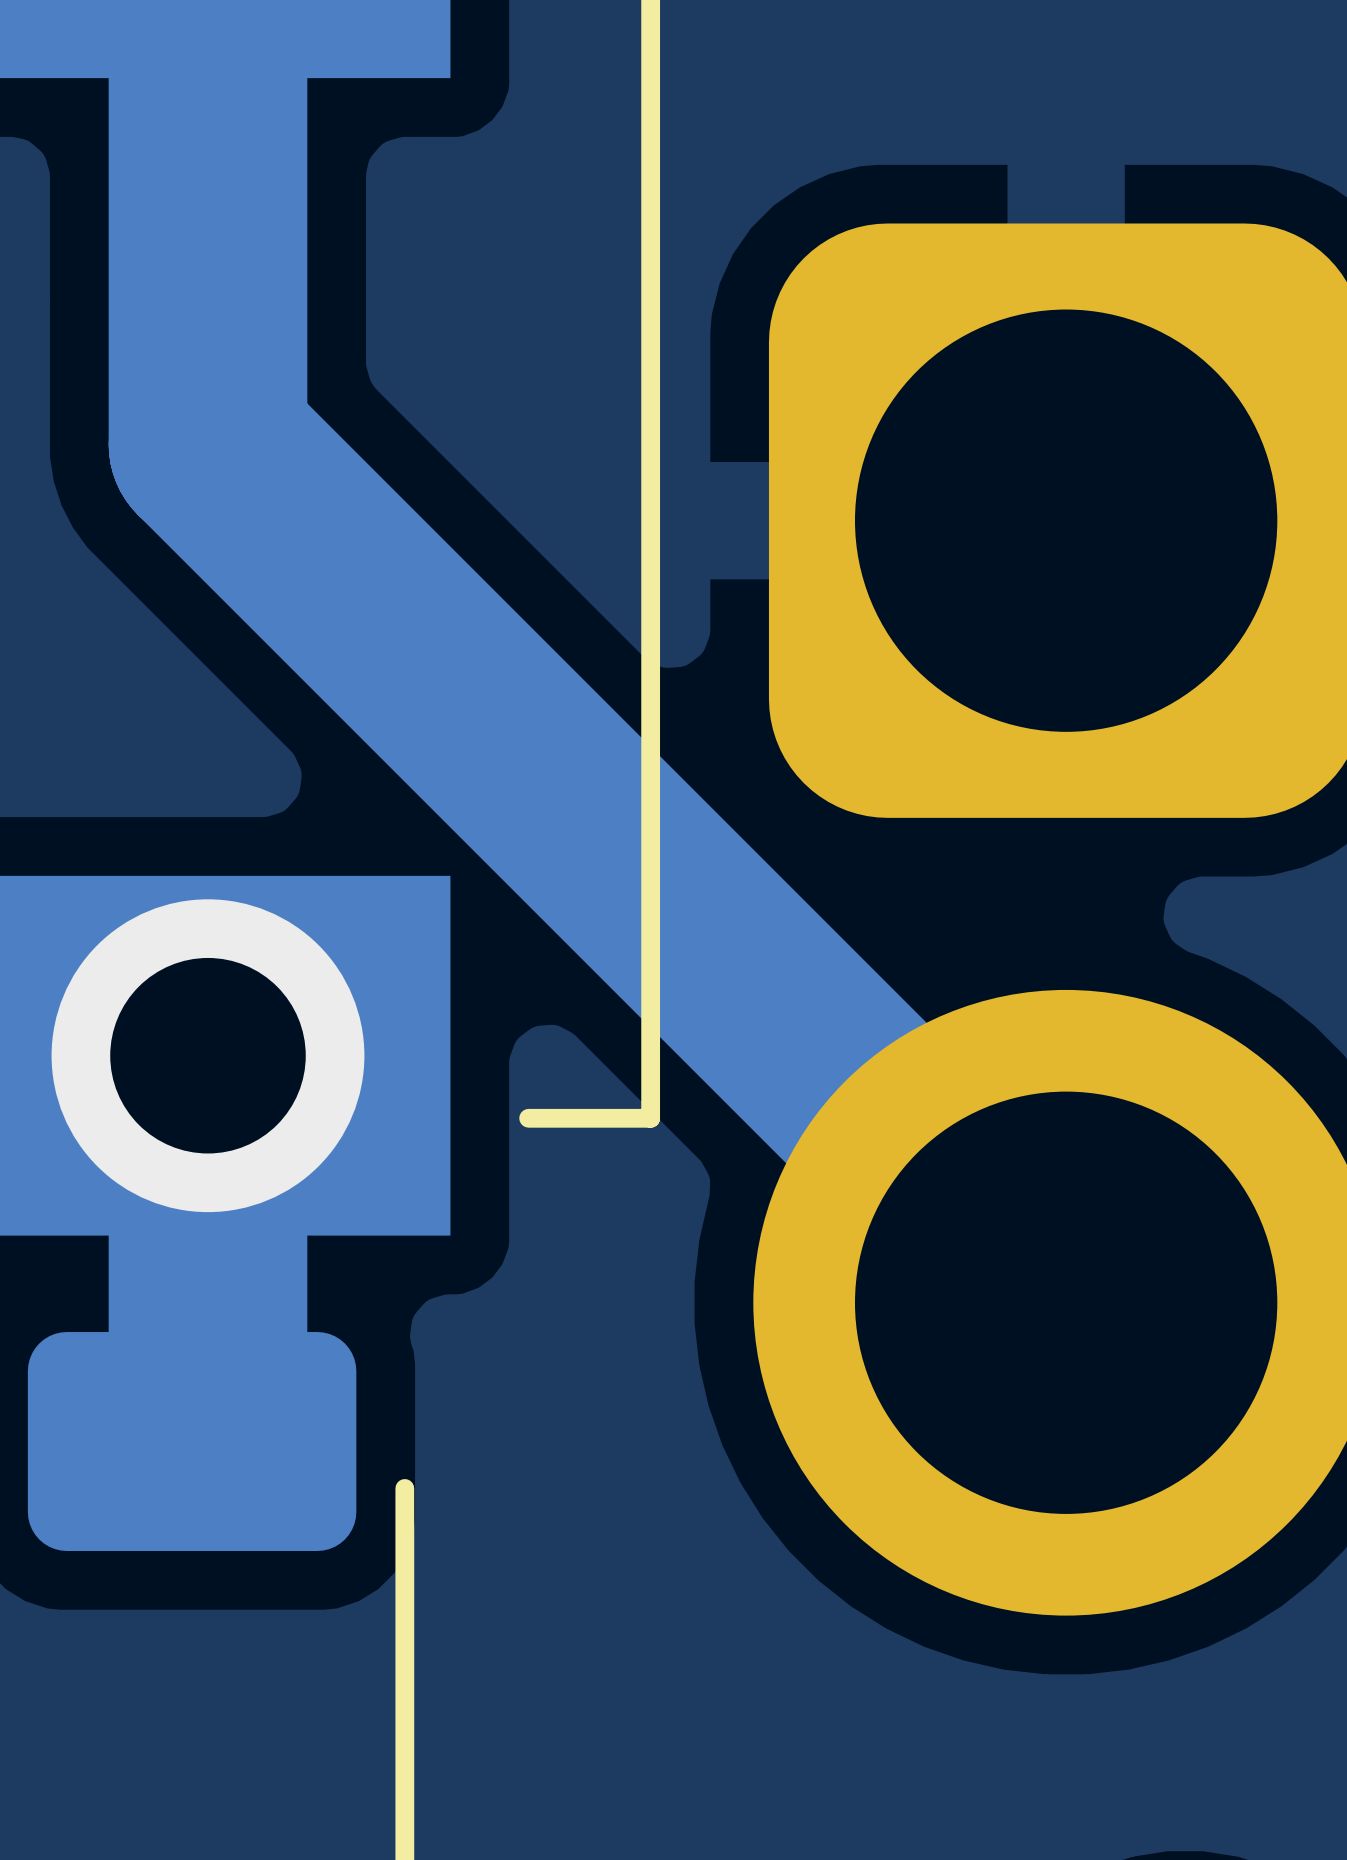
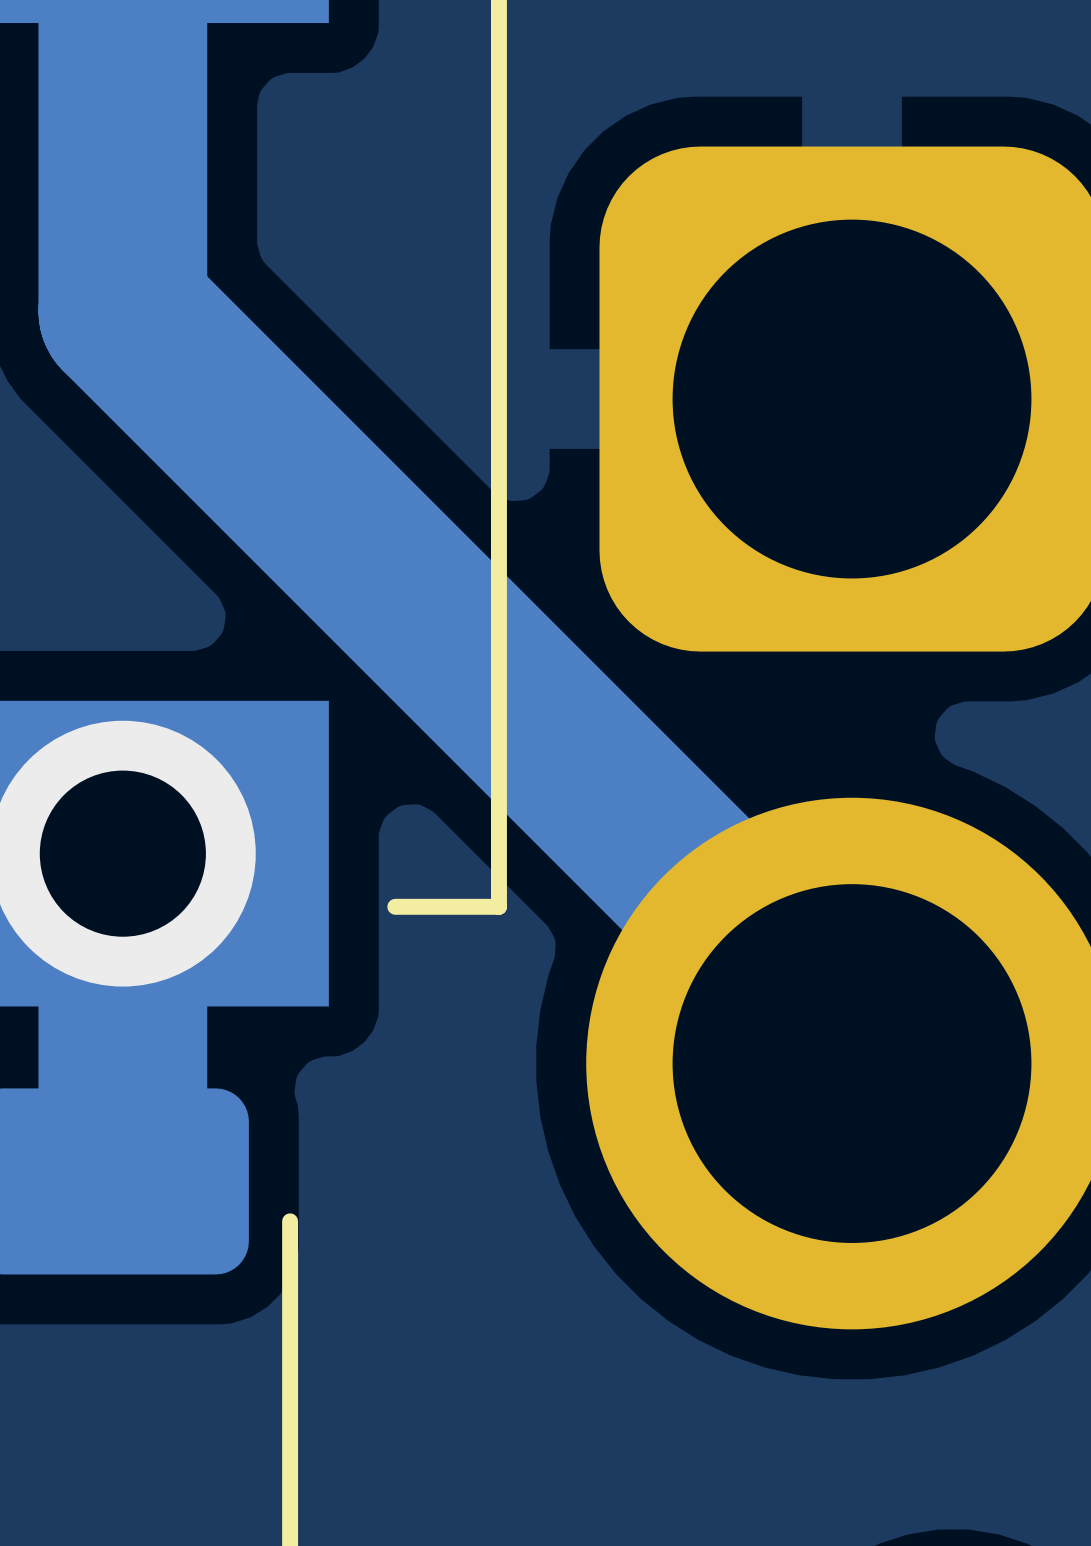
track: (207, 417) (207, 444) (1066, 1302) -> (122, 311) (852, 1040) (852, 1063)

